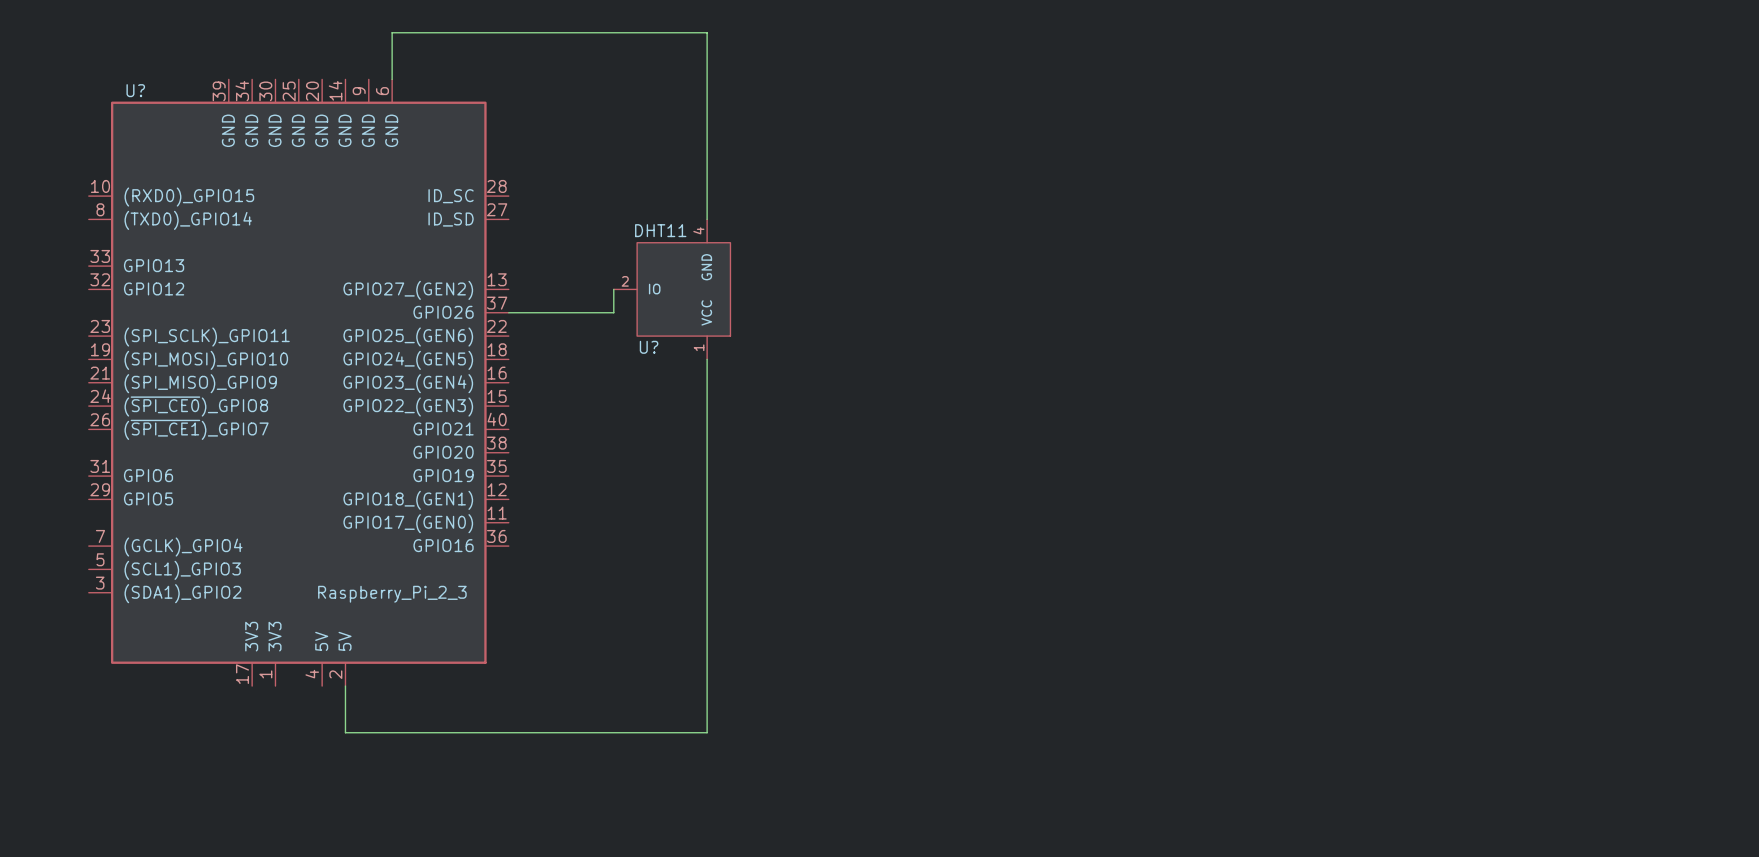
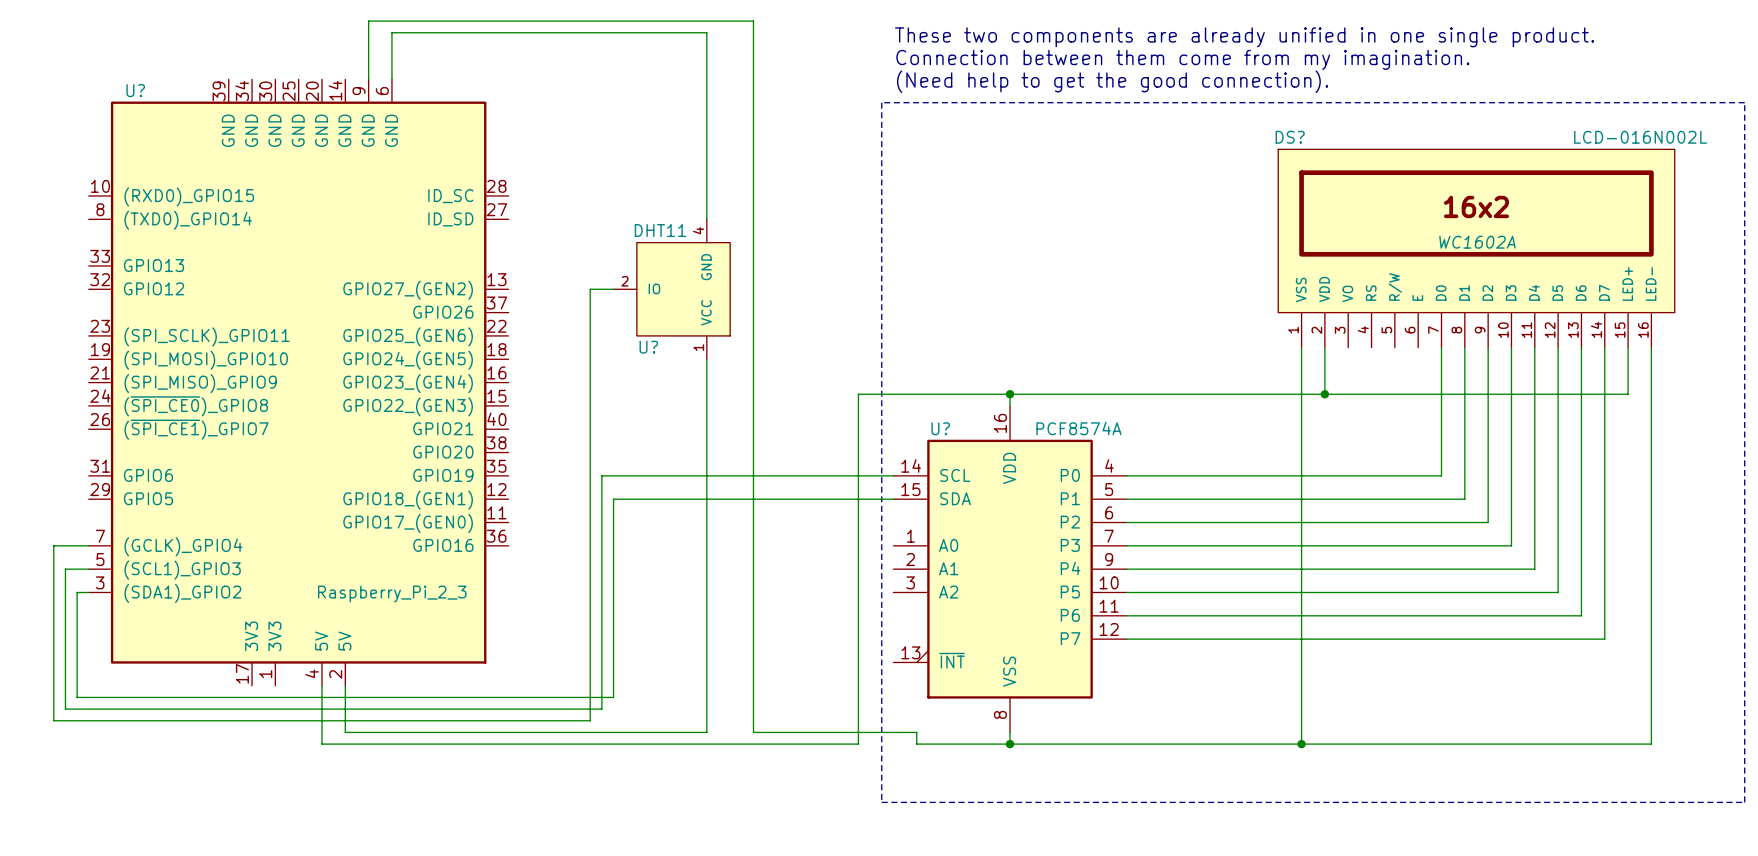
text: none -> These two components are already unified in one single product. (1244, 37)
text: none -> Connection between them come from my imagination. (1182, 59)
wire: none -> (368, 79) (368, 21) (753, 21) (753, 732) (916, 732) (916, 744) (1651, 744) (1651, 347)
text: none -> (Need help to get the good connection). (1112, 81)
line: none -> (881, 102) (881, 802) (1744, 802) (1744, 102) (881, 102)
DS?: none -> LCD-016N002L (1476, 248)
wire: (613, 289) (613, 312) (508, 312) -> (613, 289) (590, 289) (590, 720) (53, 720) (53, 545) (88, 545)
wire: none -> (1301, 347) (1301, 744)
wire: none -> (1324, 347) (1324, 394)
wire: none -> (1441, 347) (1441, 475) (1126, 475)
wire: none -> (1464, 347) (1464, 499) (1126, 499)
wire: none -> (1488, 347) (1488, 522) (1126, 522)
wire: none -> (1511, 347) (1511, 545) (1126, 545)
wire: none -> (1534, 347) (1534, 569) (1126, 569)
wire: none -> (1558, 347) (1558, 592) (1126, 592)
wire: none -> (1581, 347) (1581, 615) (1126, 615)
wire: none -> (1604, 347) (1604, 639) (1126, 639)
wire: none -> (1628, 347) (1628, 394) (858, 394) (858, 744) (322, 744) (322, 685)
wire: none -> (1010, 394) (1010, 405)
junction: none -> (1010, 394)
junction: none -> (1324, 394)
wire: none -> (893, 475) (601, 475) (601, 709) (65, 709) (65, 569) (88, 569)
wire: none -> (893, 499) (613, 499) (613, 697) (77, 697) (77, 592) (88, 592)
U?: none -> PCF8574A (1010, 569)
wire: none -> (1010, 732) (1010, 744)
junction: none -> (1010, 744)
junction: none -> (1301, 744)

